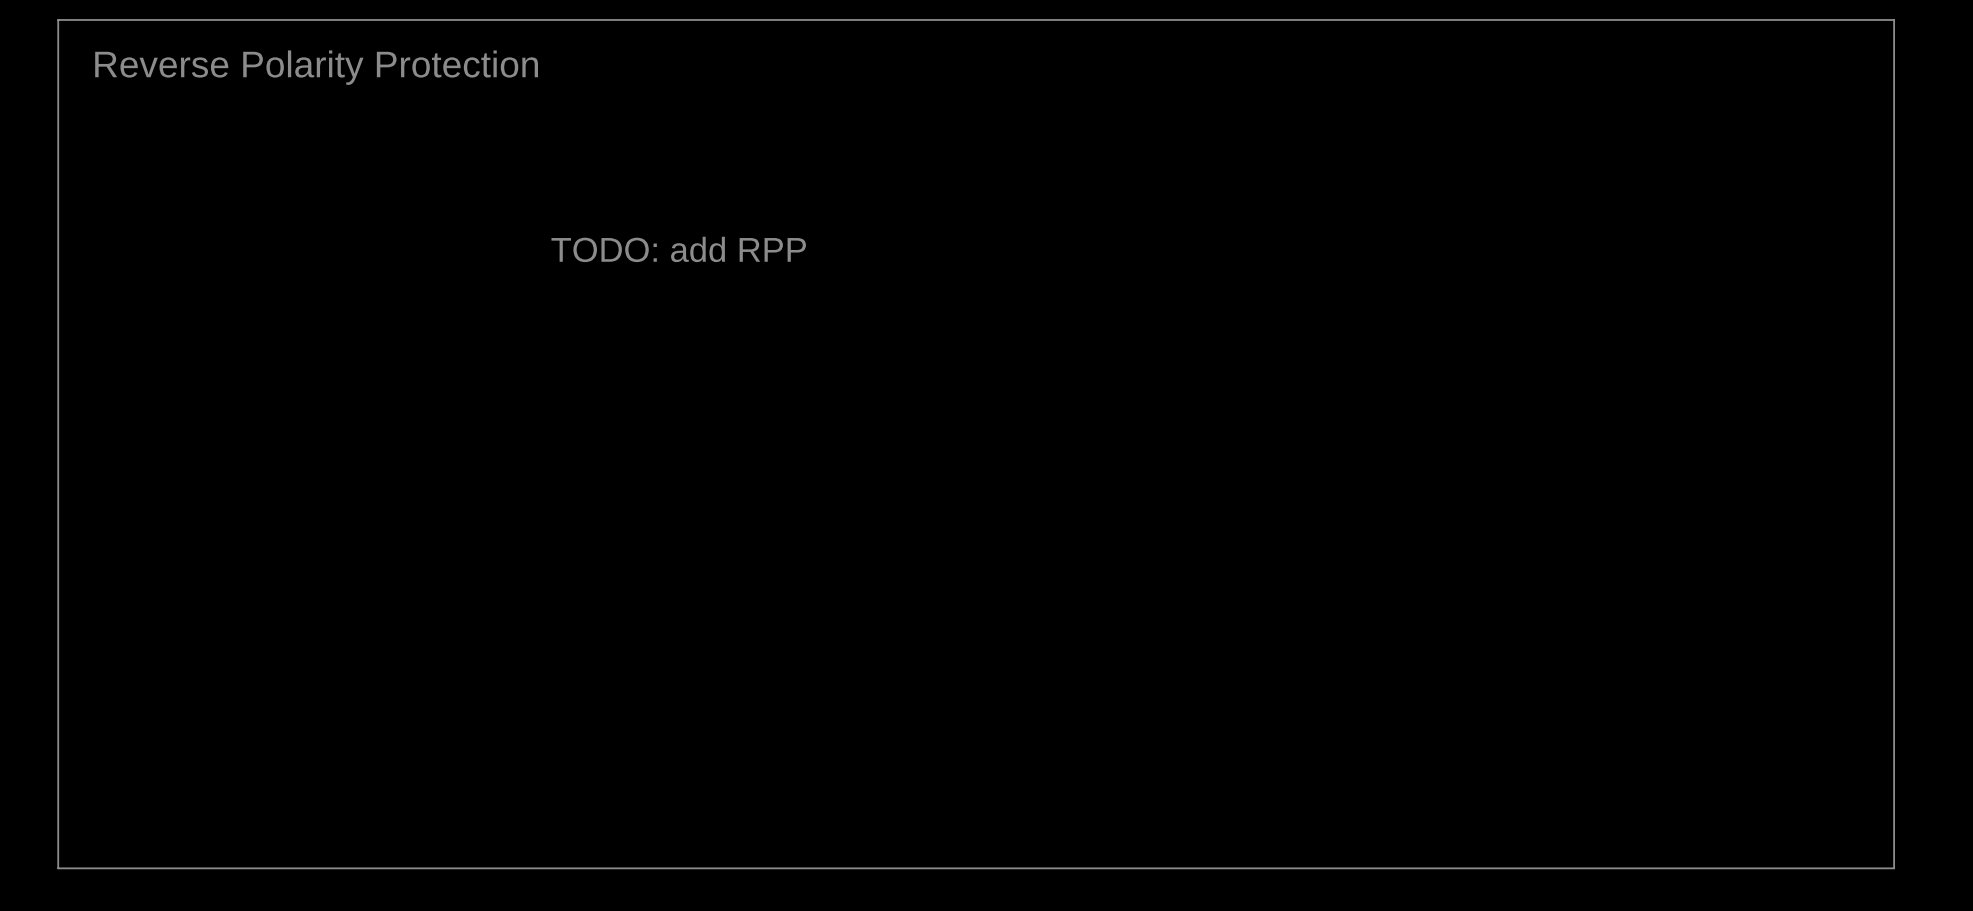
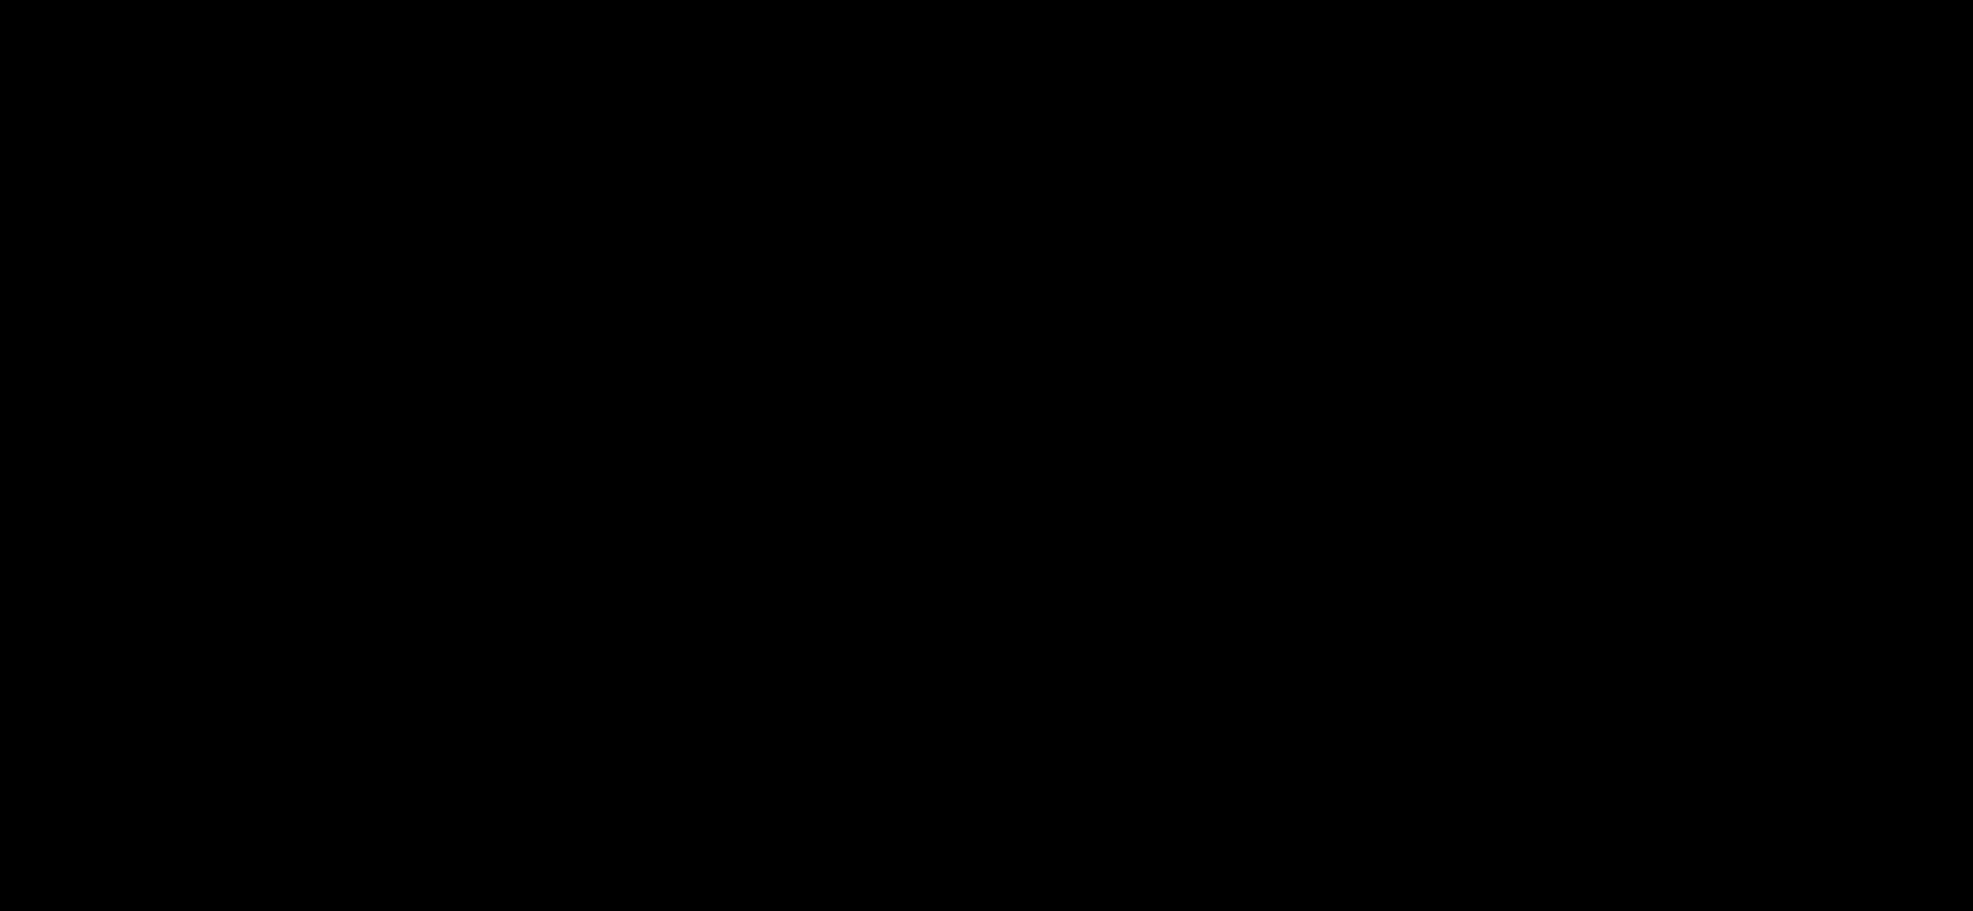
line: (58, 19) (1894, 19) (1894, 868) (58, 868) (58, 19) -> none
text: Reverse Polarity Protection (316, 67) -> none
text: TODO: add RPP (678, 249) -> none

